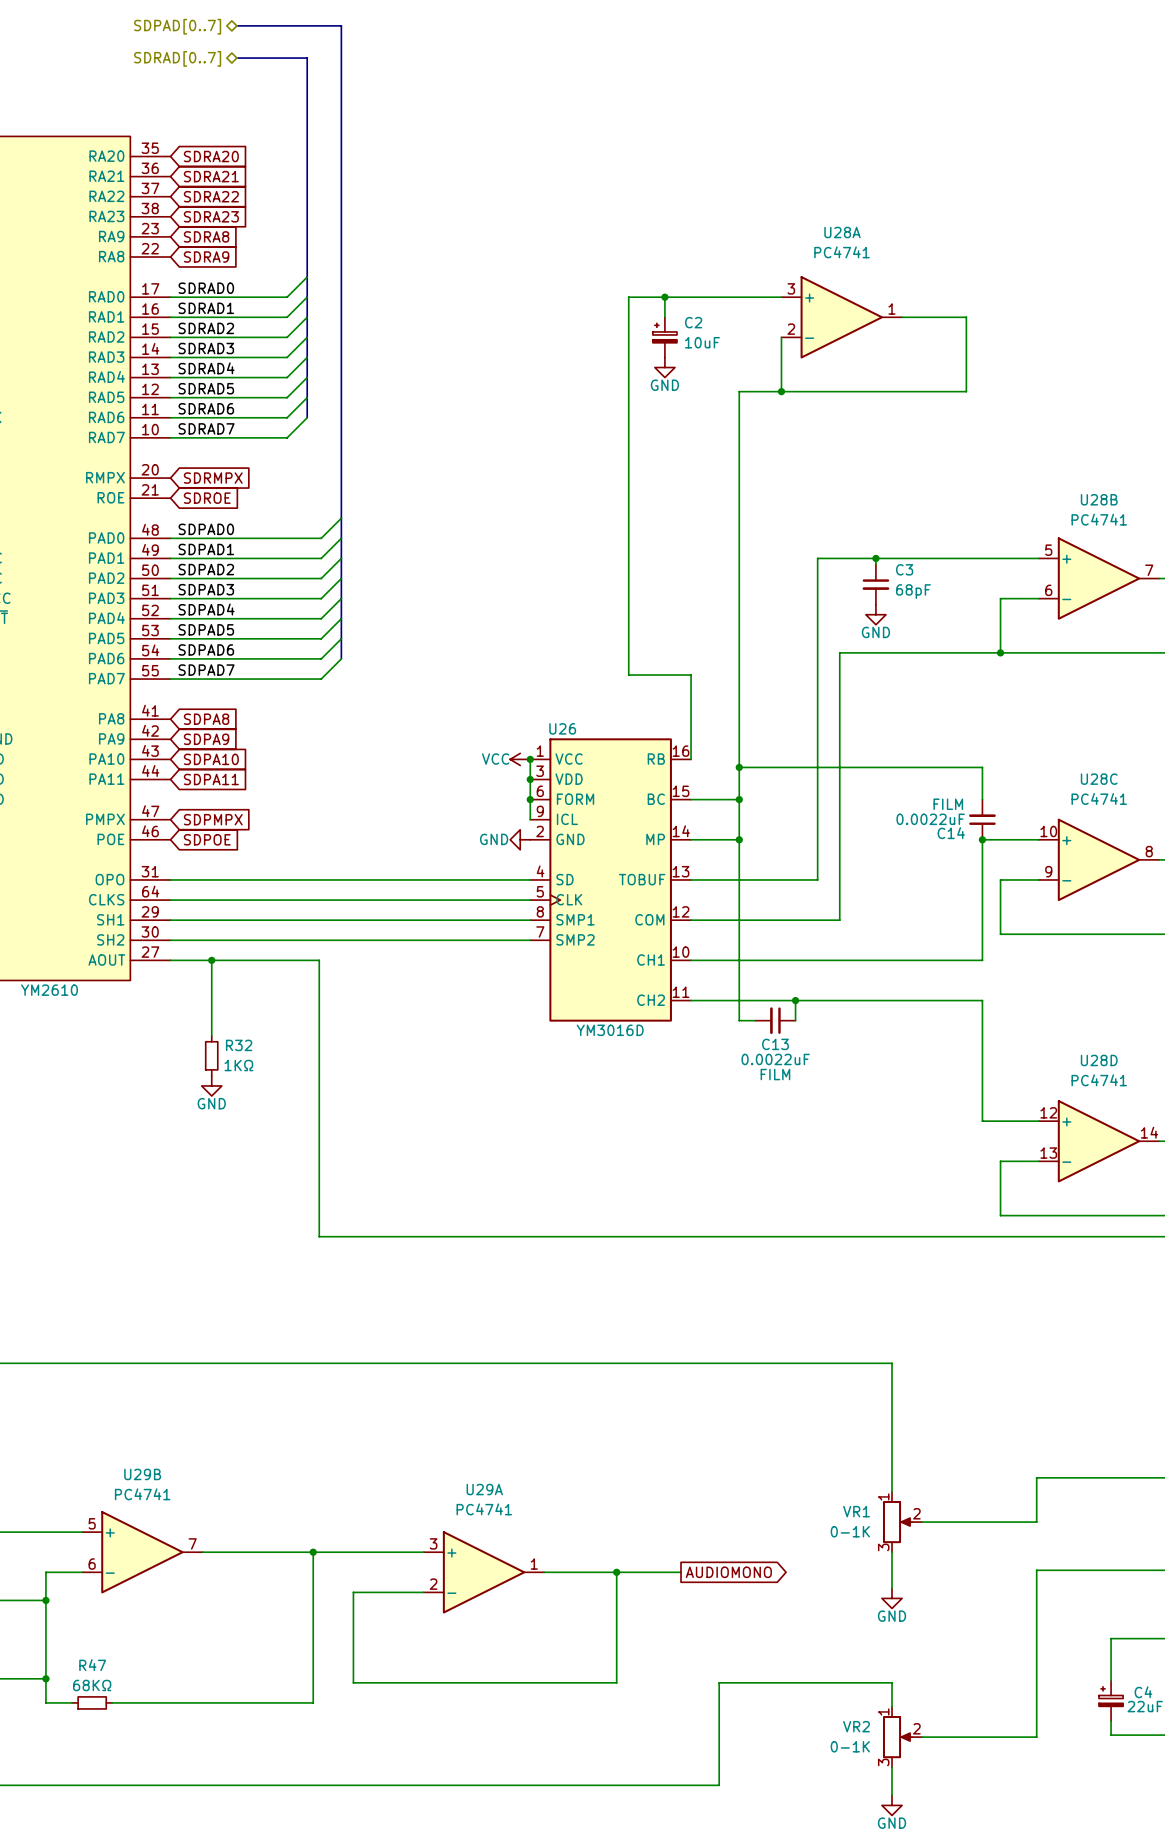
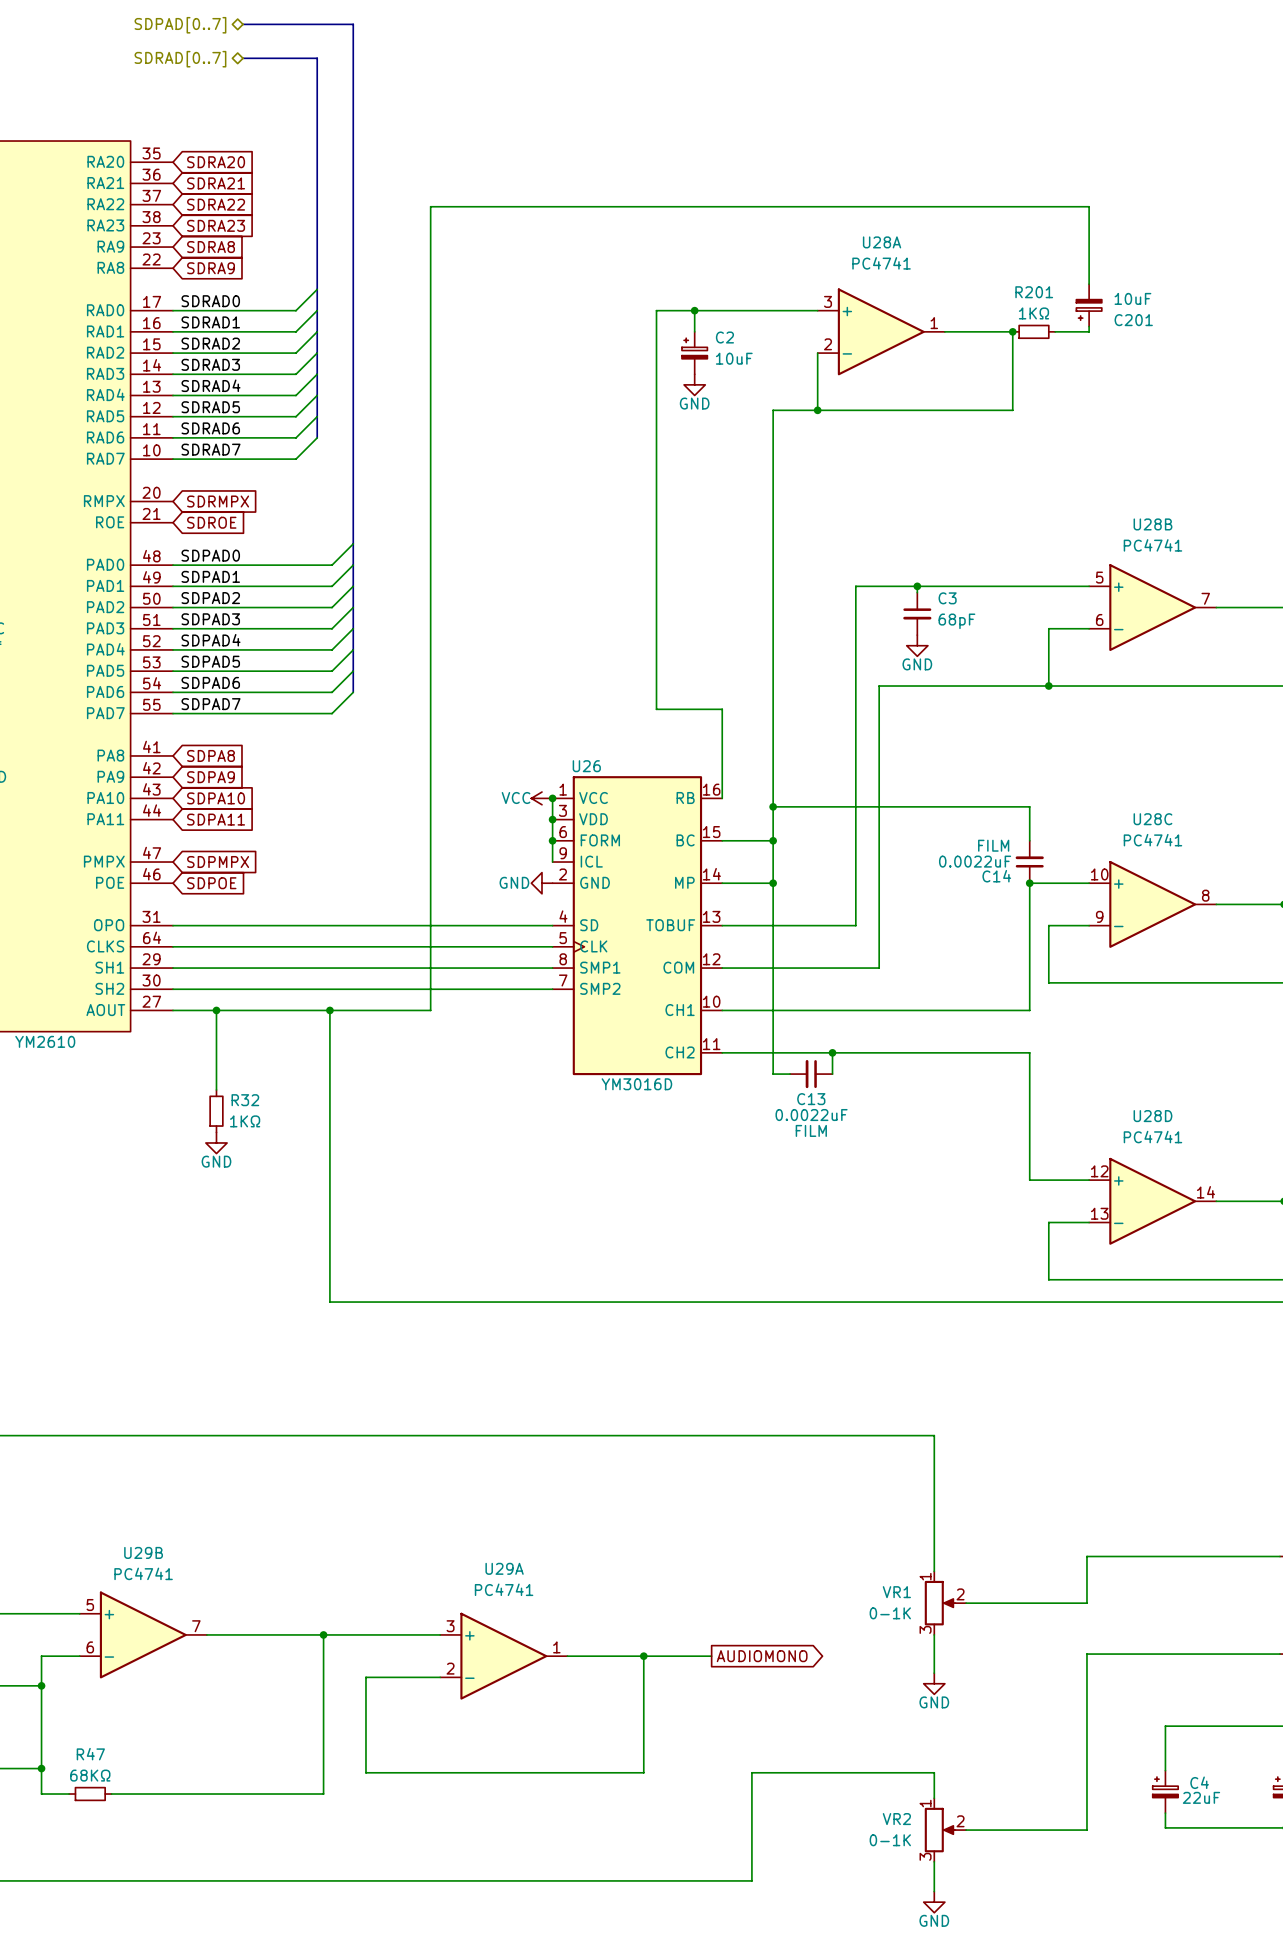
wire: none -> (1089, 284) (1089, 206) (430, 206) (430, 1010) (329, 1010)
C201: none -> 10uF (1089, 305)
wire: none -> (1089, 326) (1089, 331) (1055, 331)
junction: none -> (1012, 331)
R201: none -> 1KΩ (1033, 331)
junction: none -> (329, 1010)

